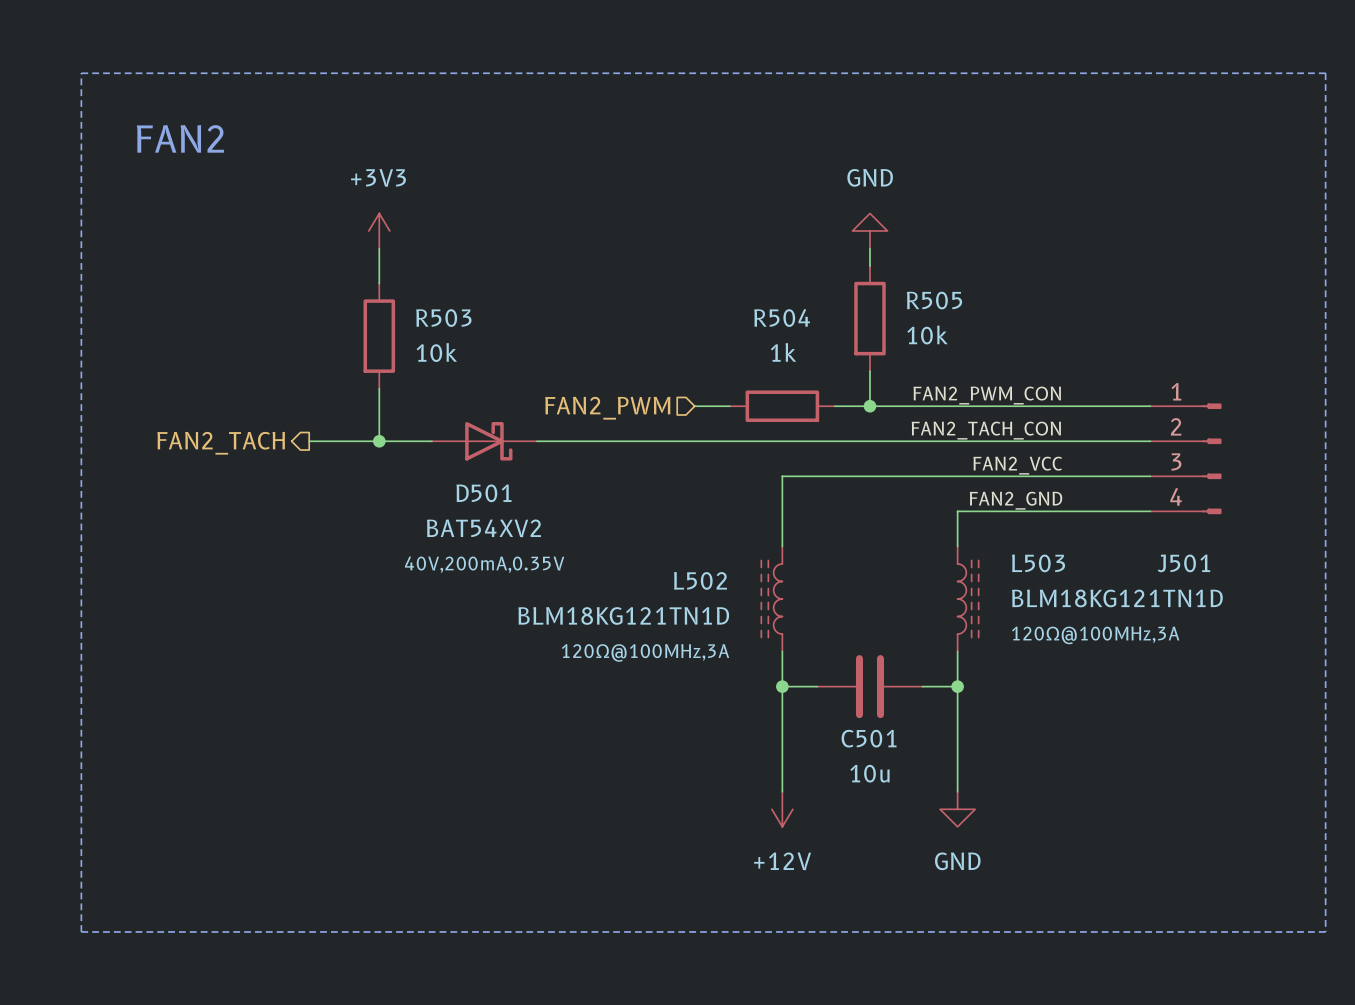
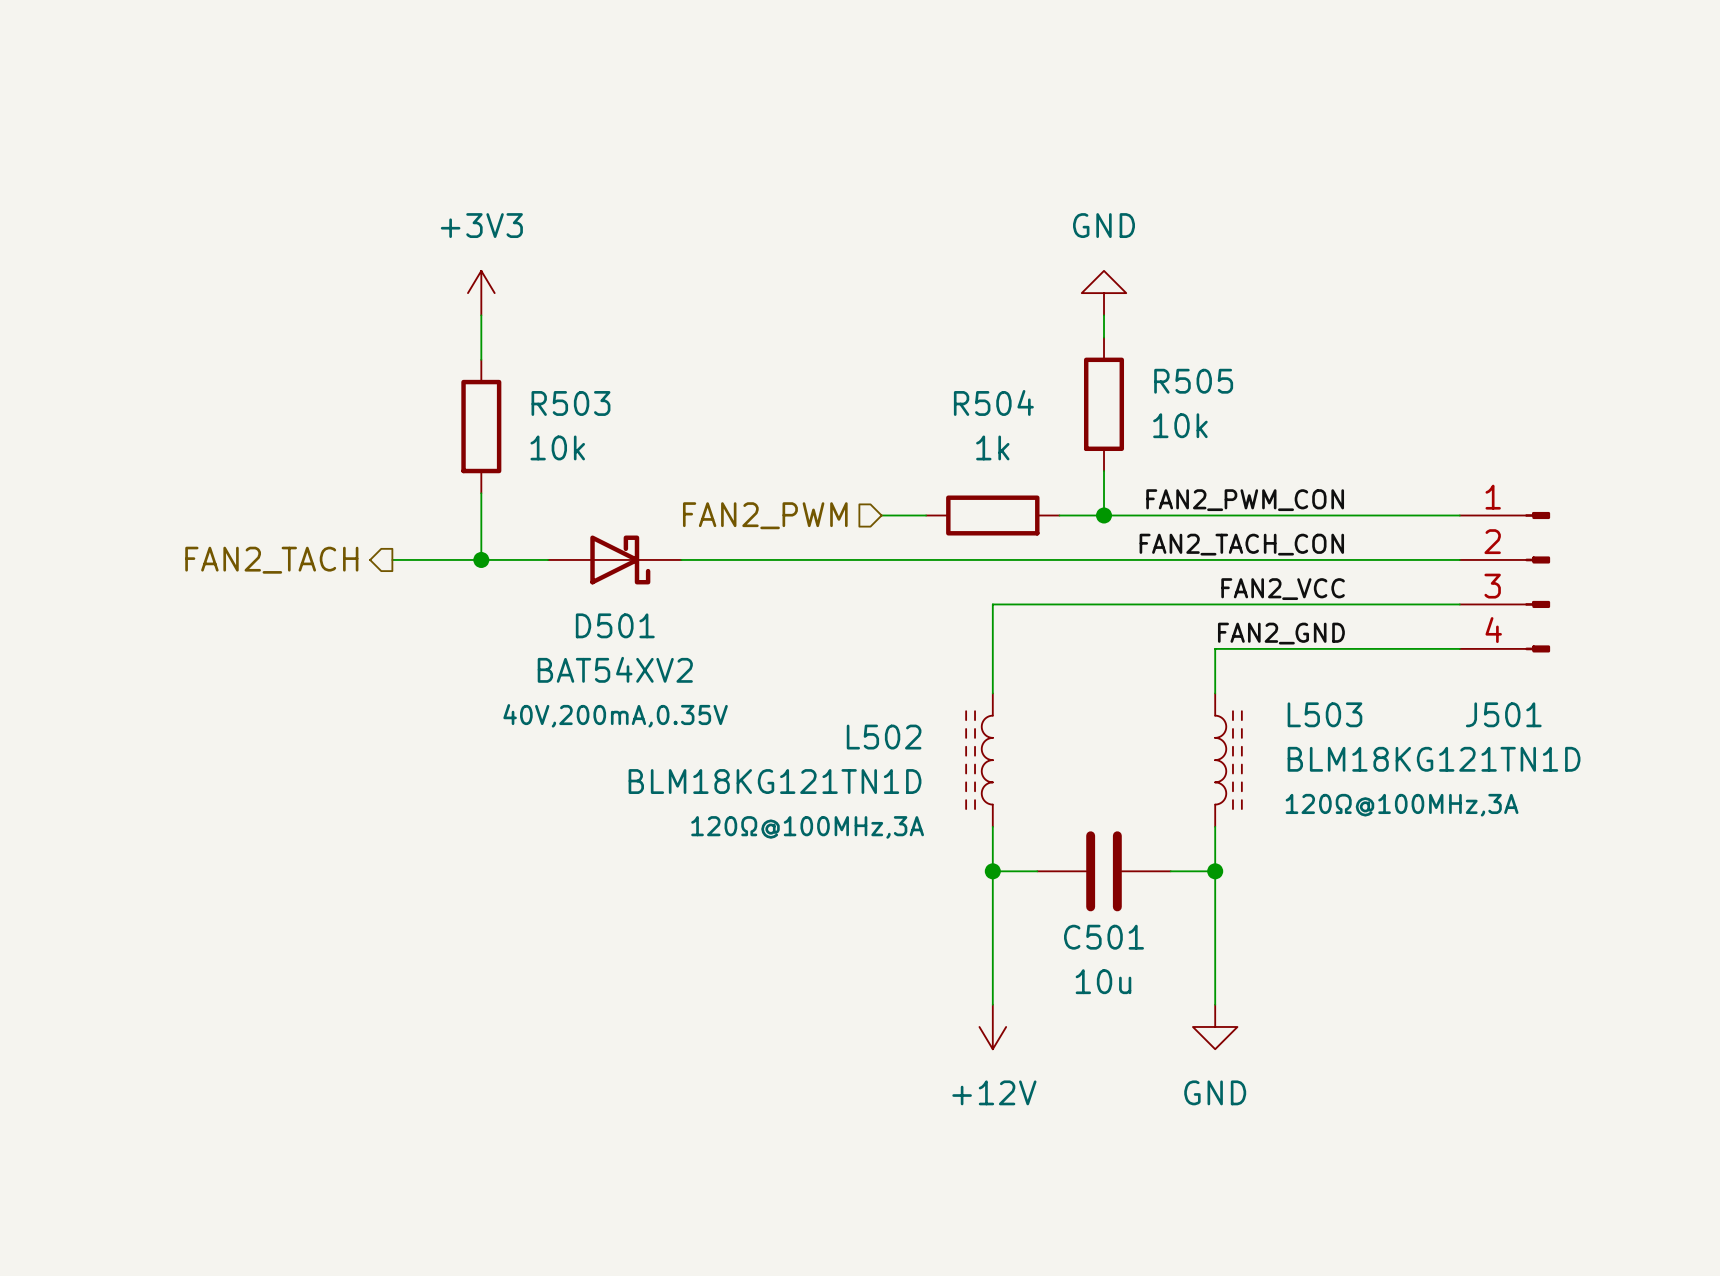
line: (81, 73) (1325, 73) (1325, 931) (81, 931) (81, 73) -> none
text: FAN2 (180, 138) -> none

